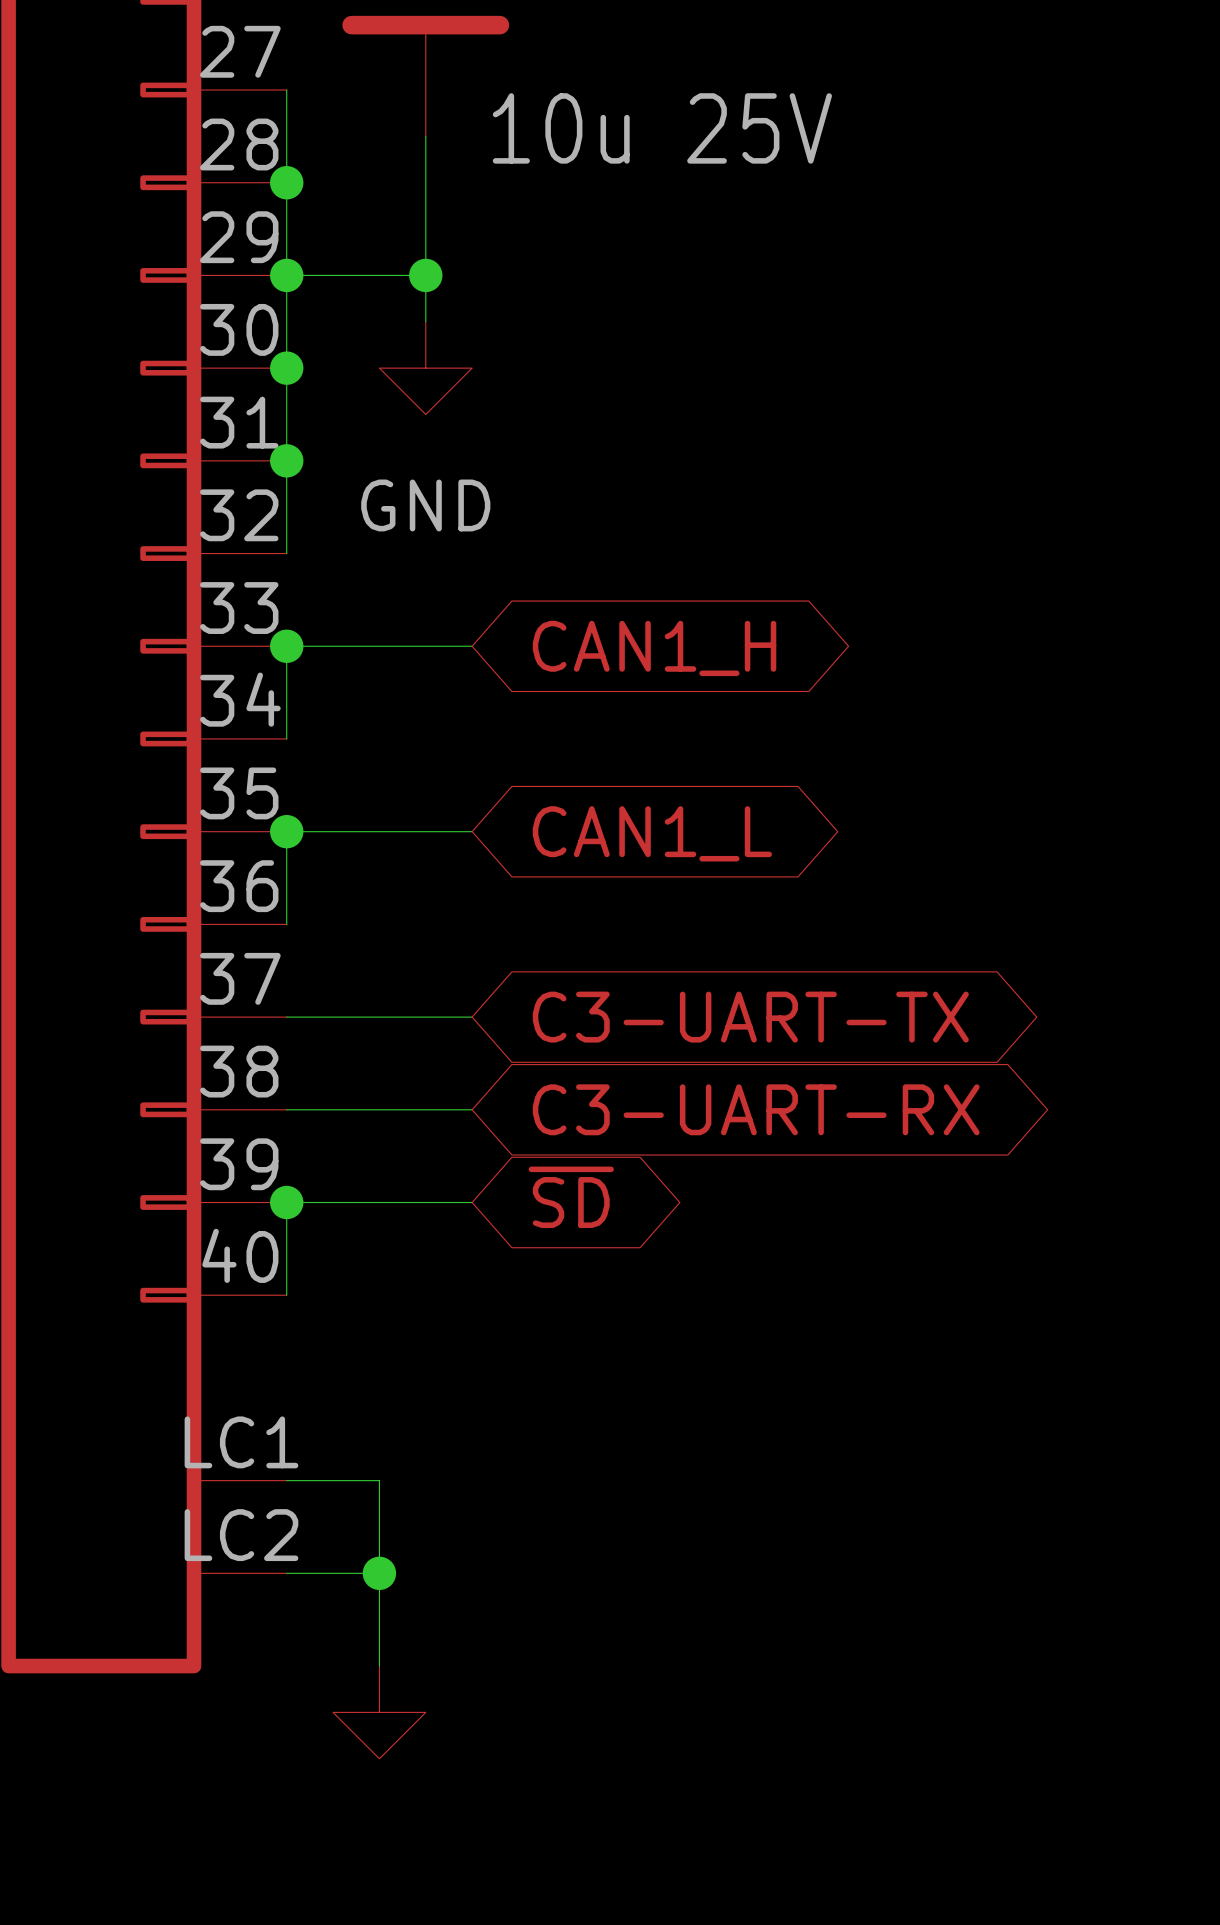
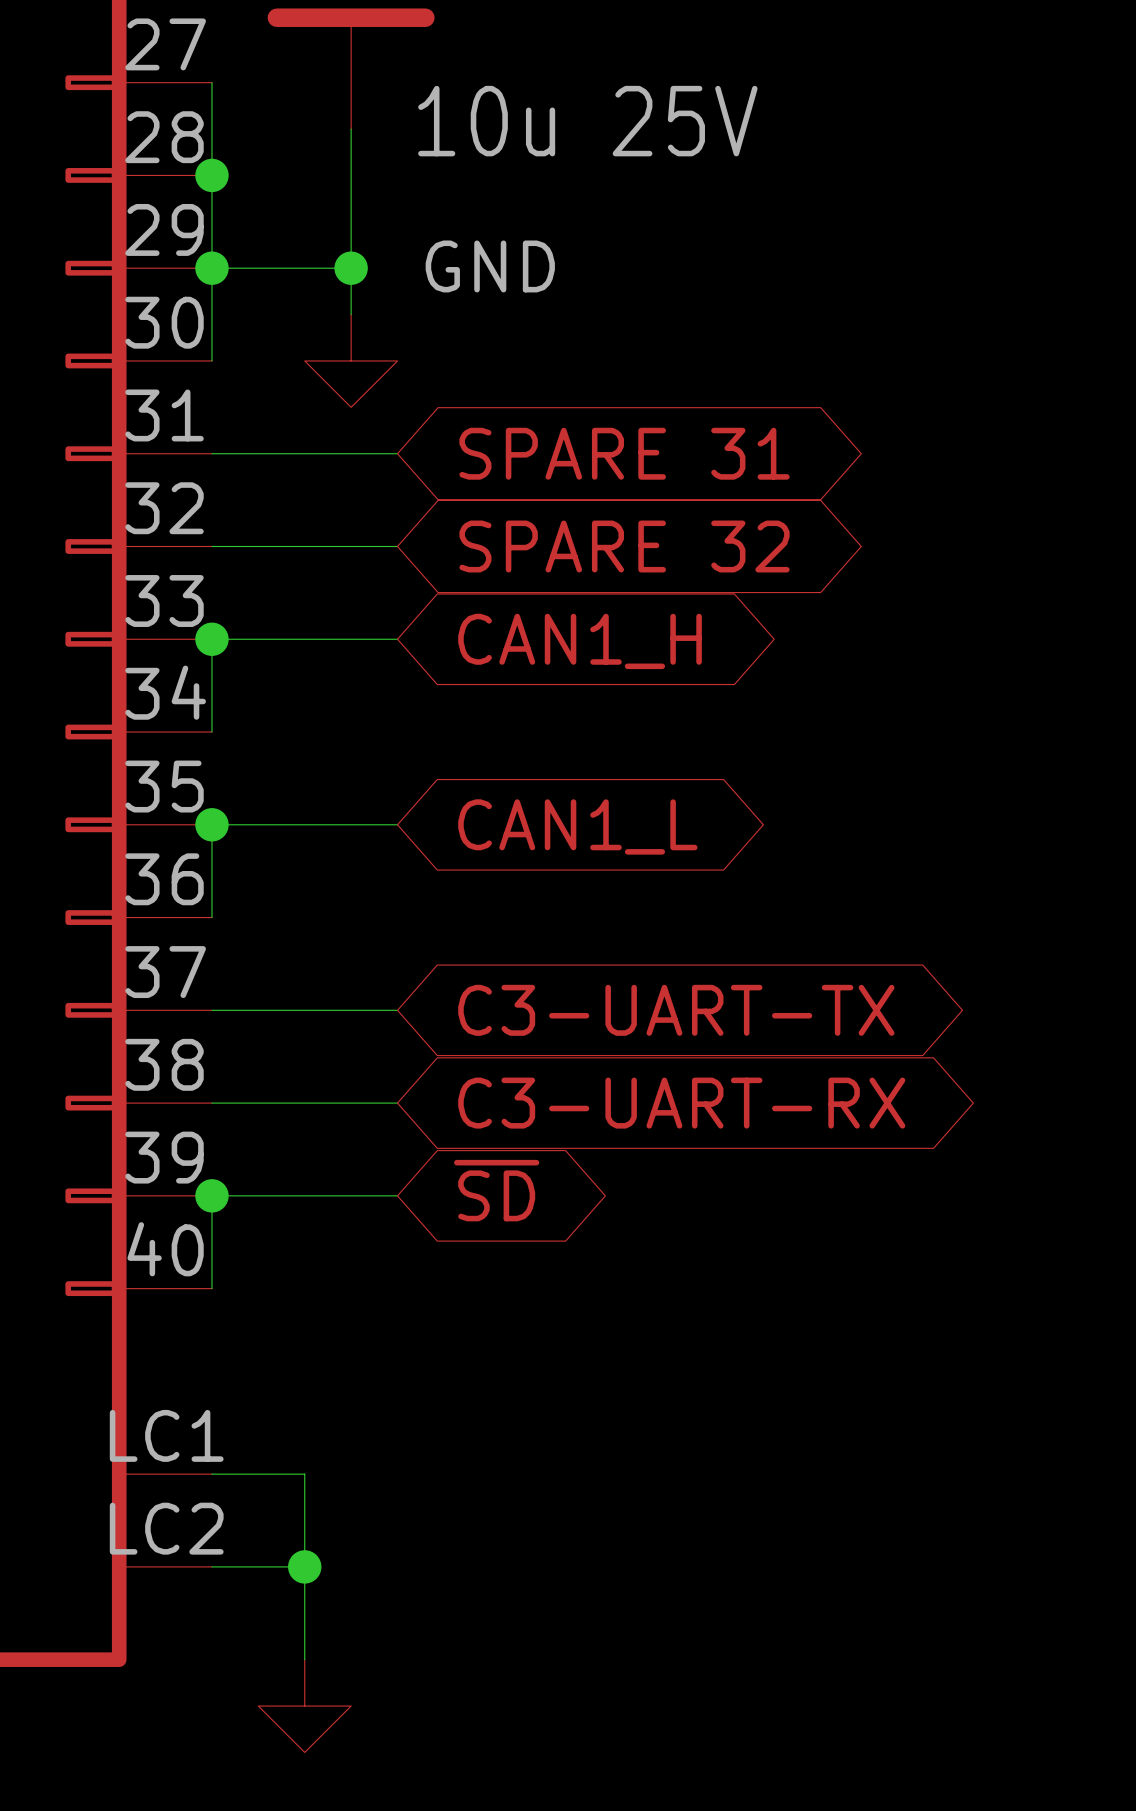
wire: (286, 368) (286, 553) -> (397, 546) (211, 546)
junction: (286, 368) -> none
wire: none -> (211, 453) (397, 453)
junction: (286, 460) -> none
global label: none -> SPARE 31 (624, 453)
power symbol text position: GND (425, 505) -> GND (490, 266)
global label: none -> SPARE 32 (624, 546)

